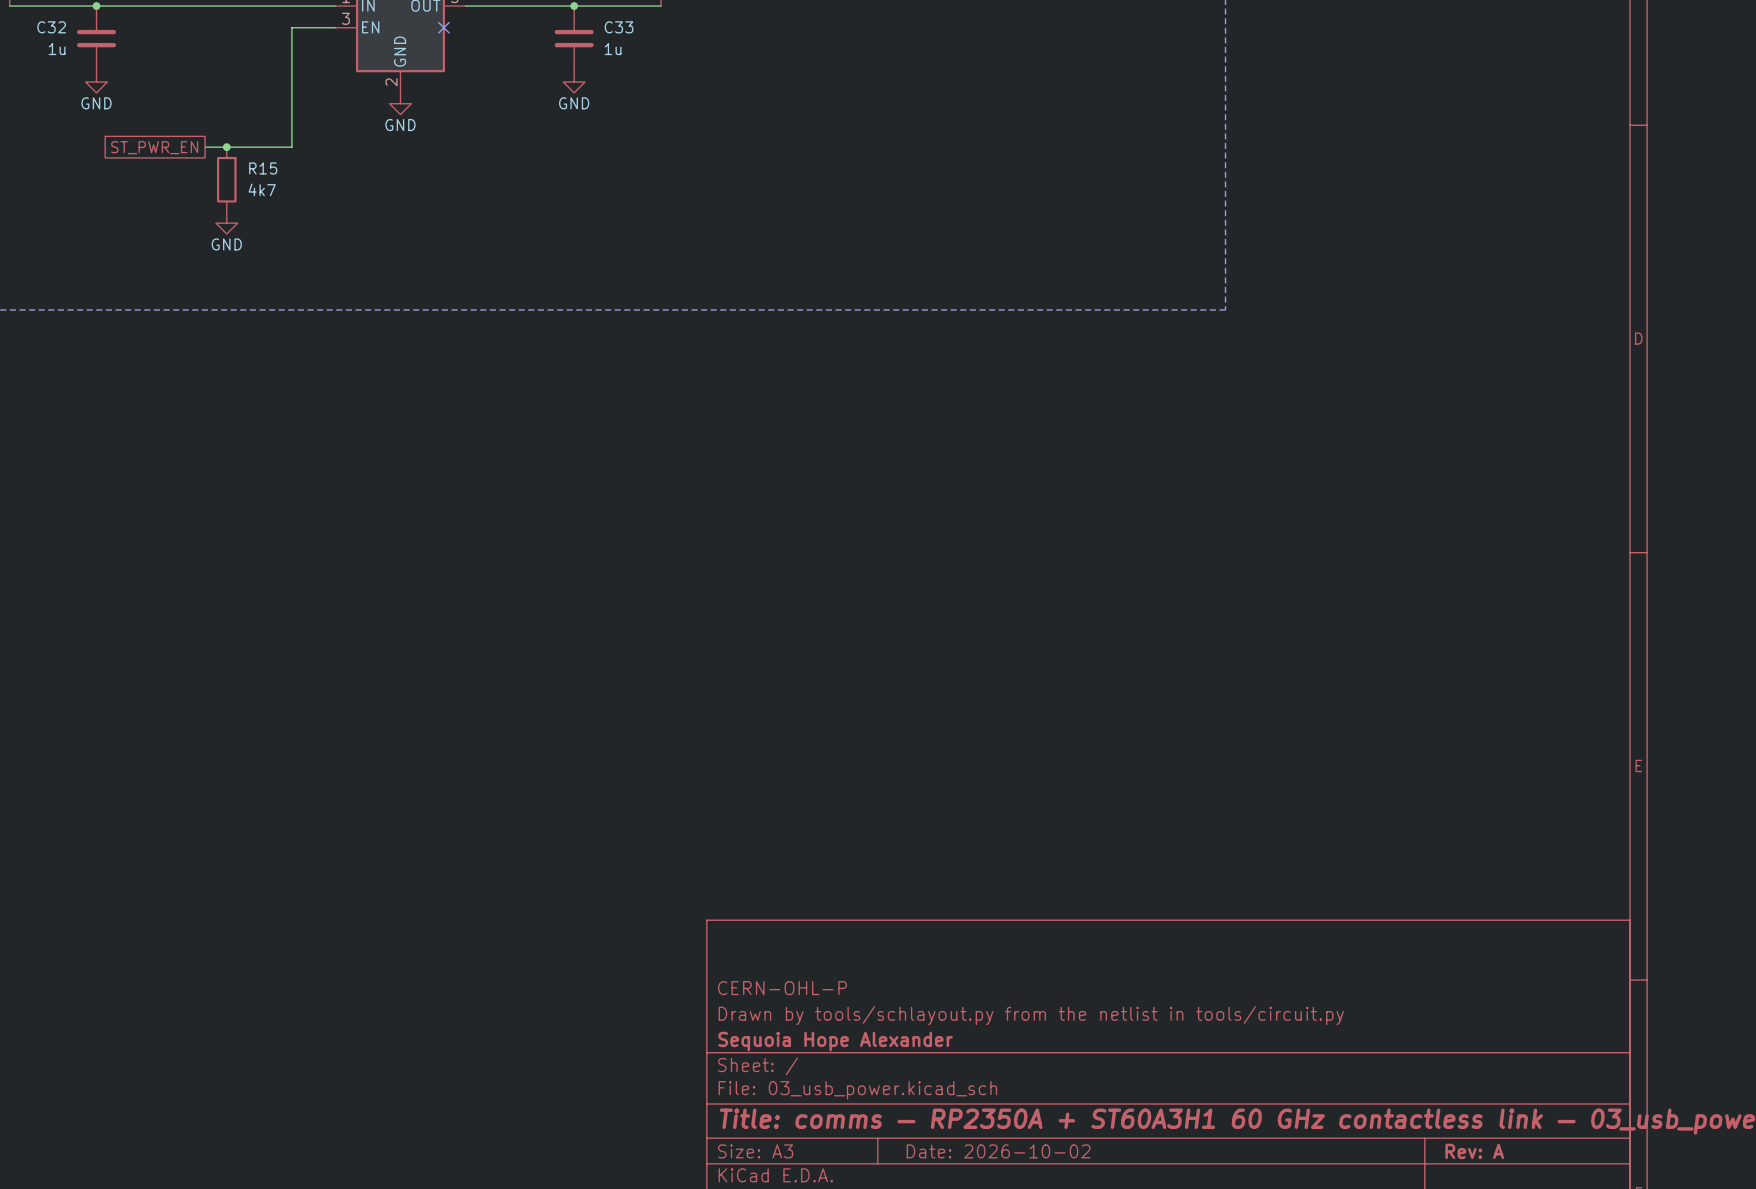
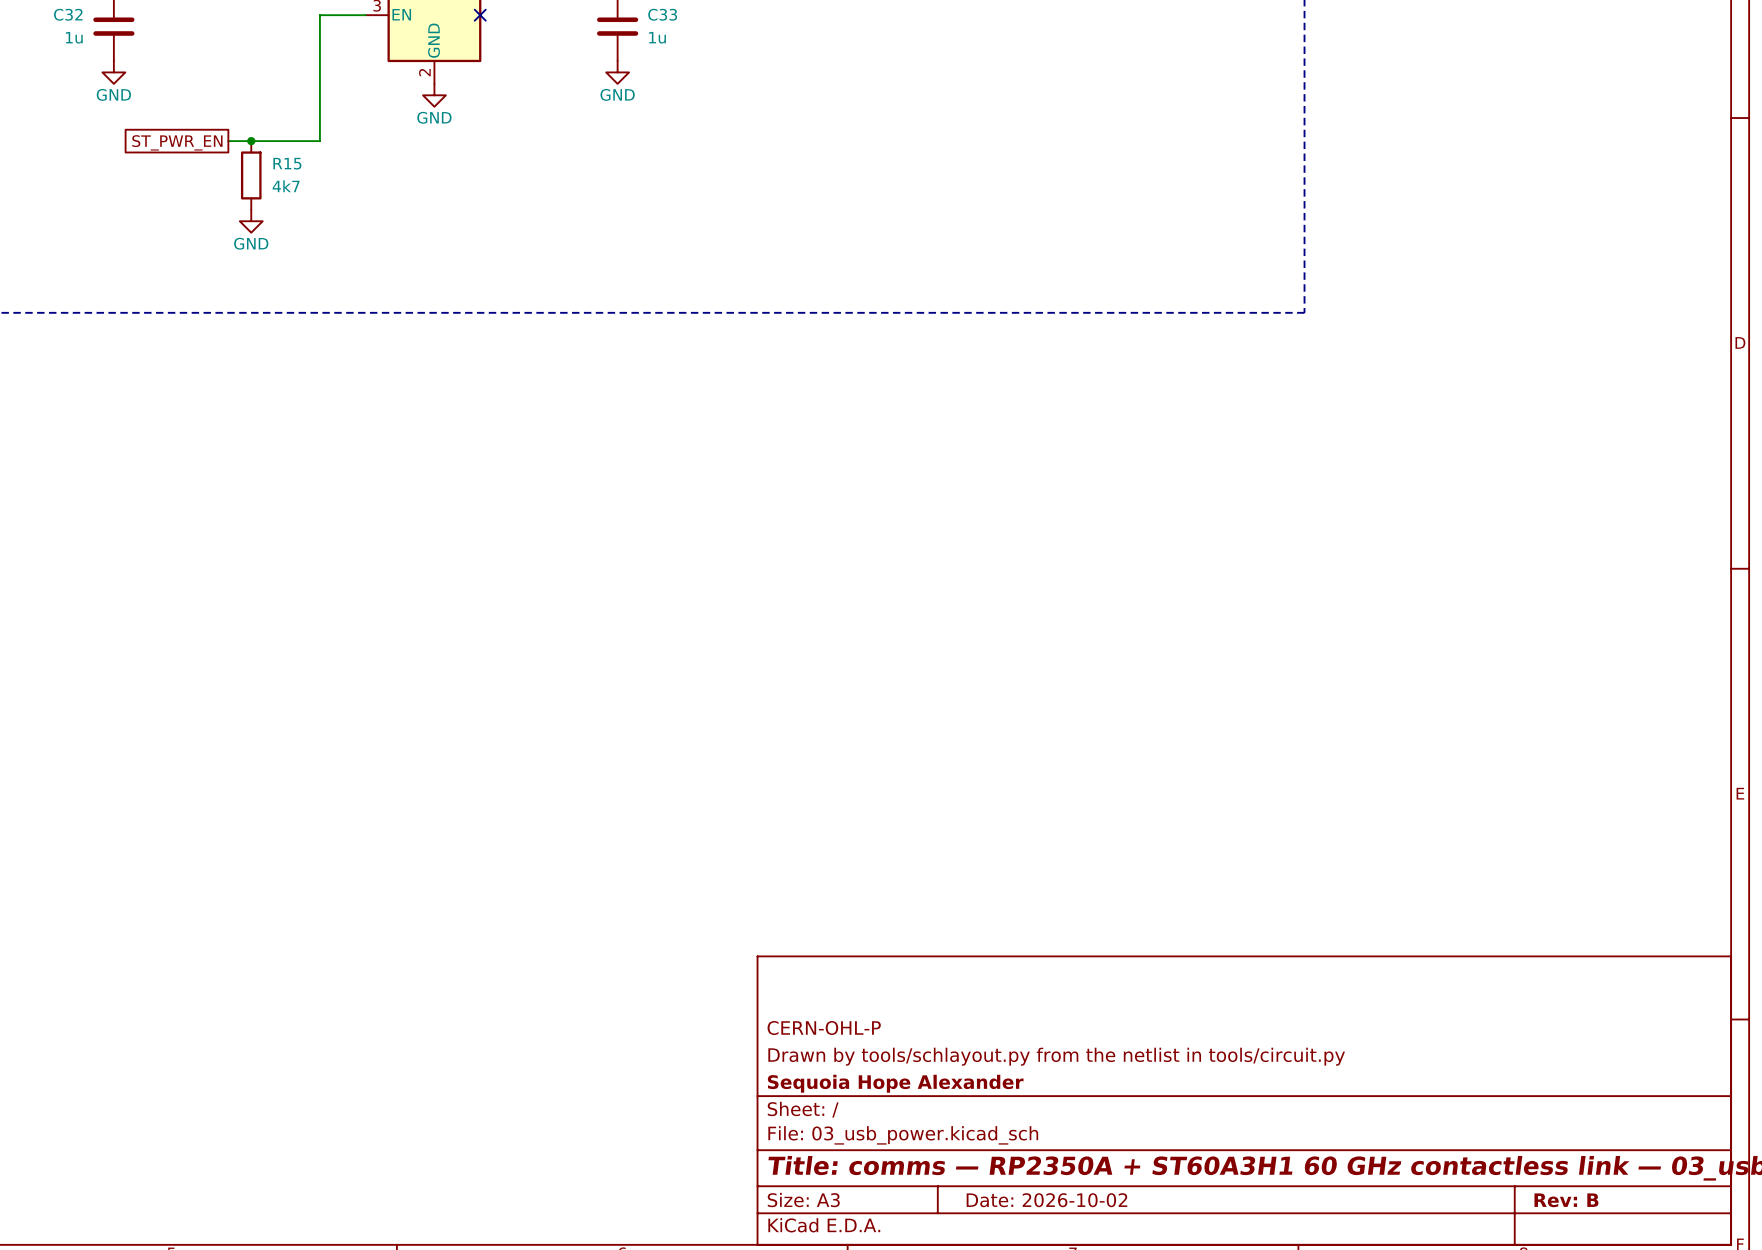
title block: Rev: A (1474, 1151) -> Rev: B (1566, 1200)

